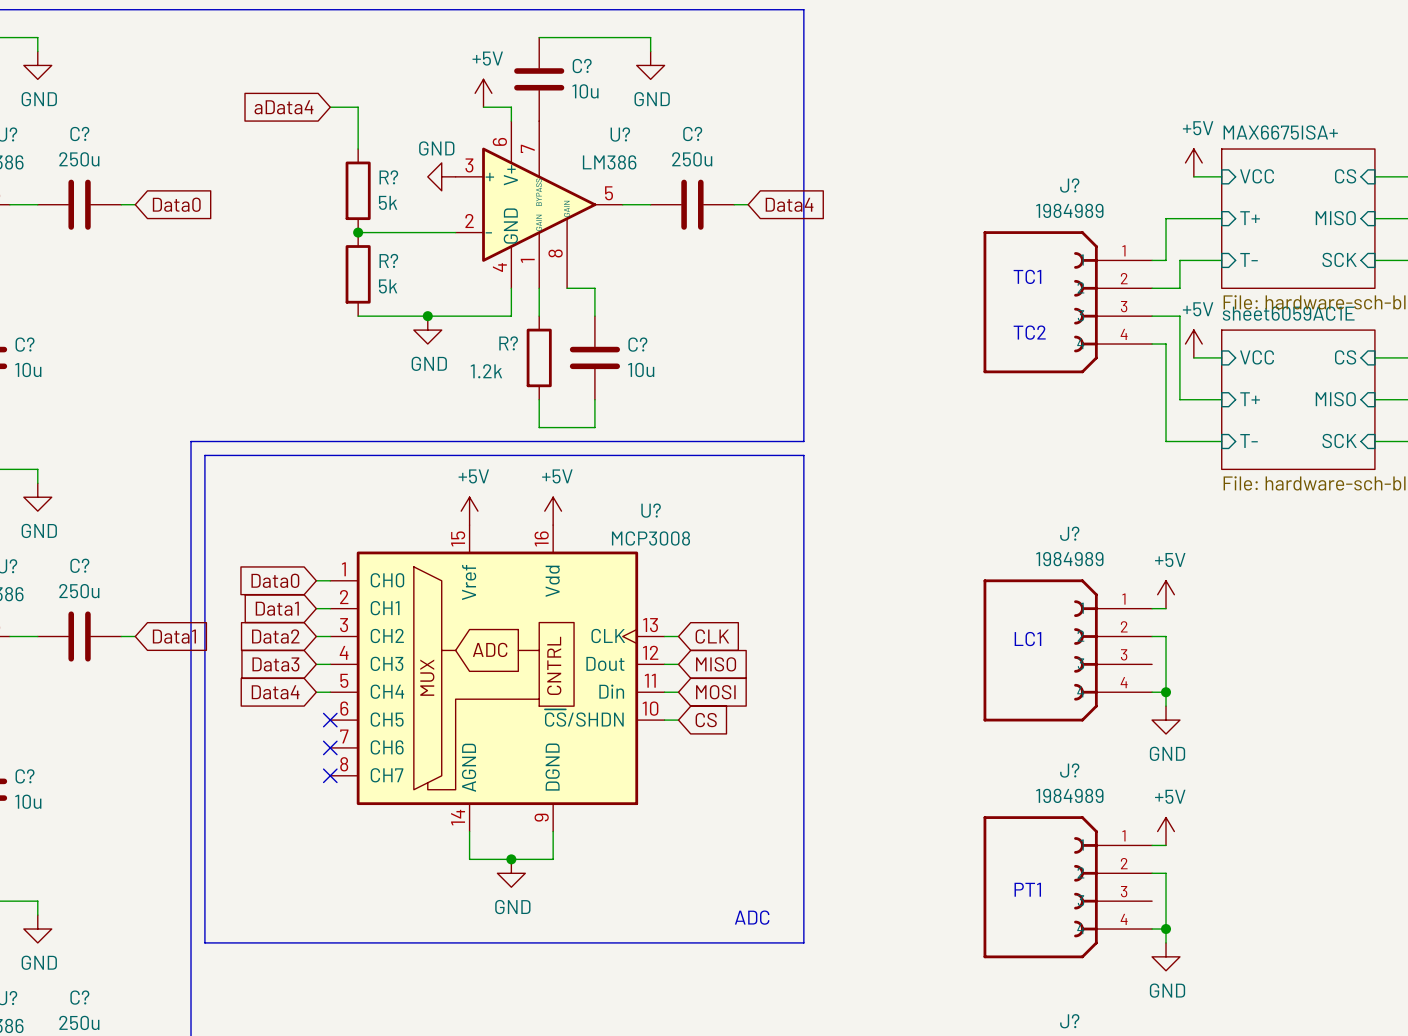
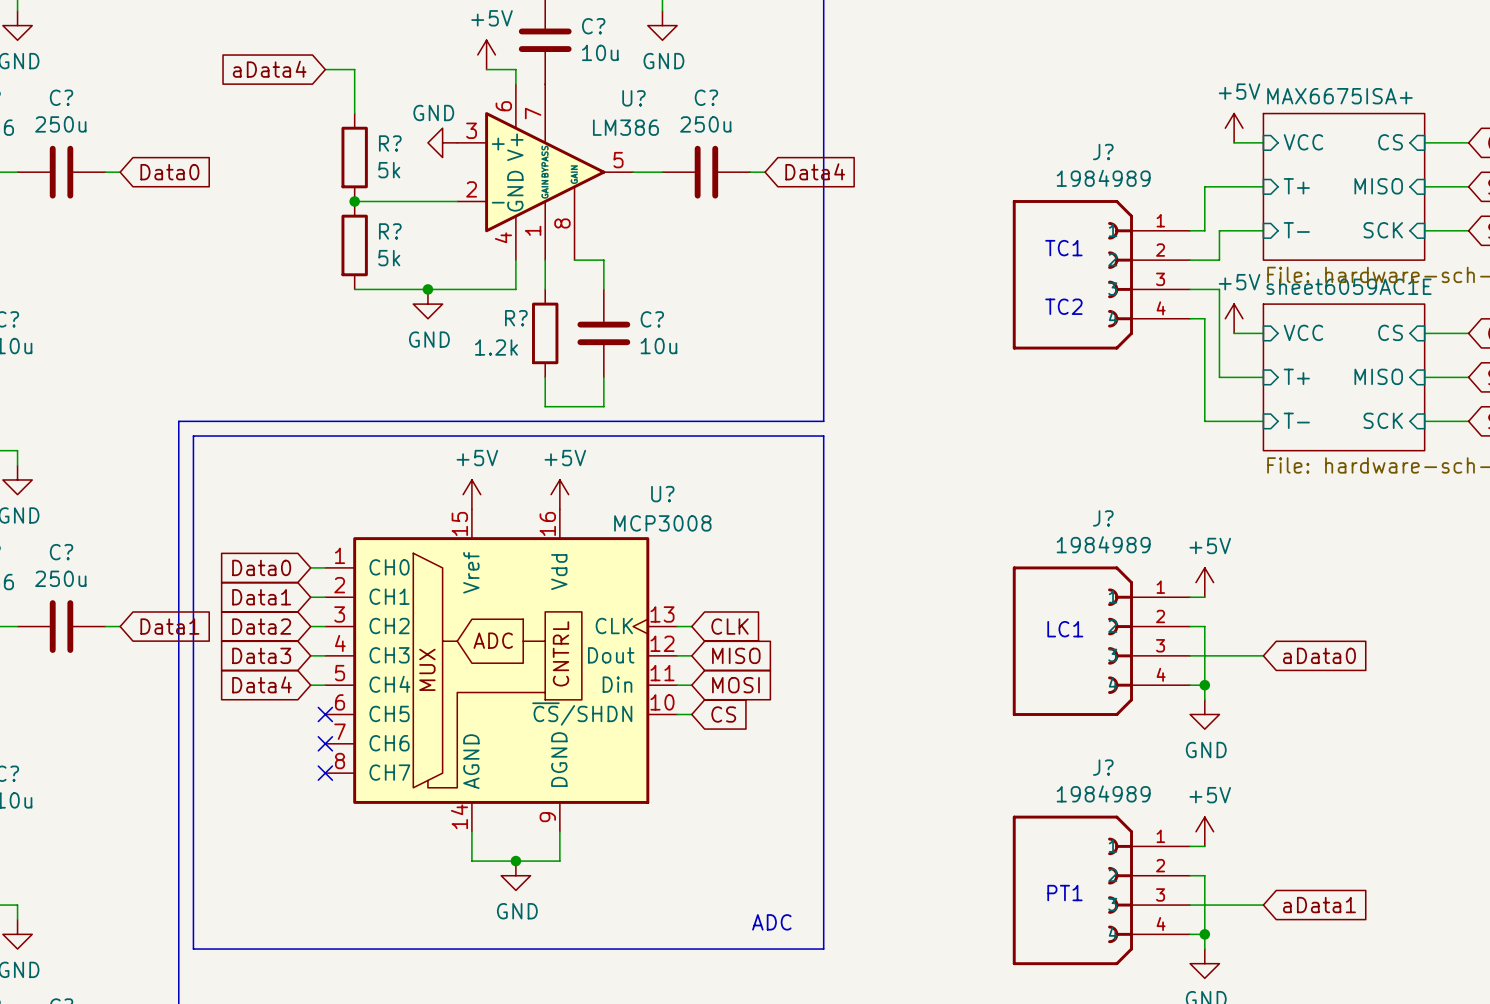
wire: none -> (1190, 655) (1263, 655)
global label: none -> aData0 (1319, 655)
wire: none -> (1190, 905) (1263, 905)
global label: none -> aData1 (1319, 905)

